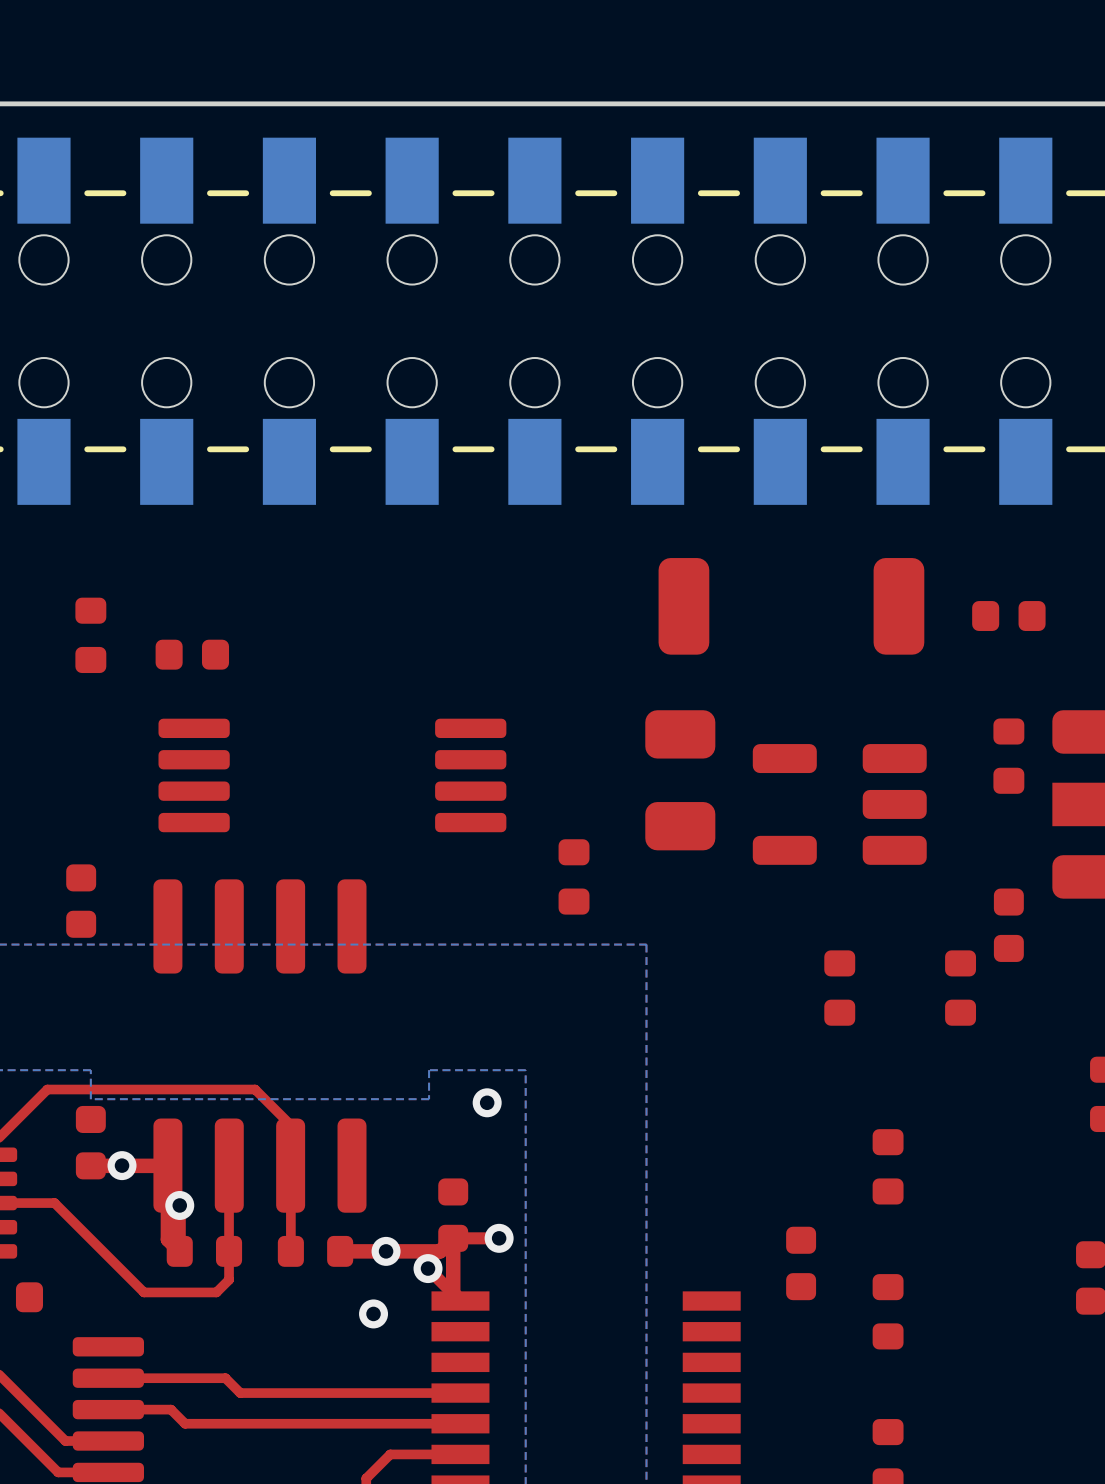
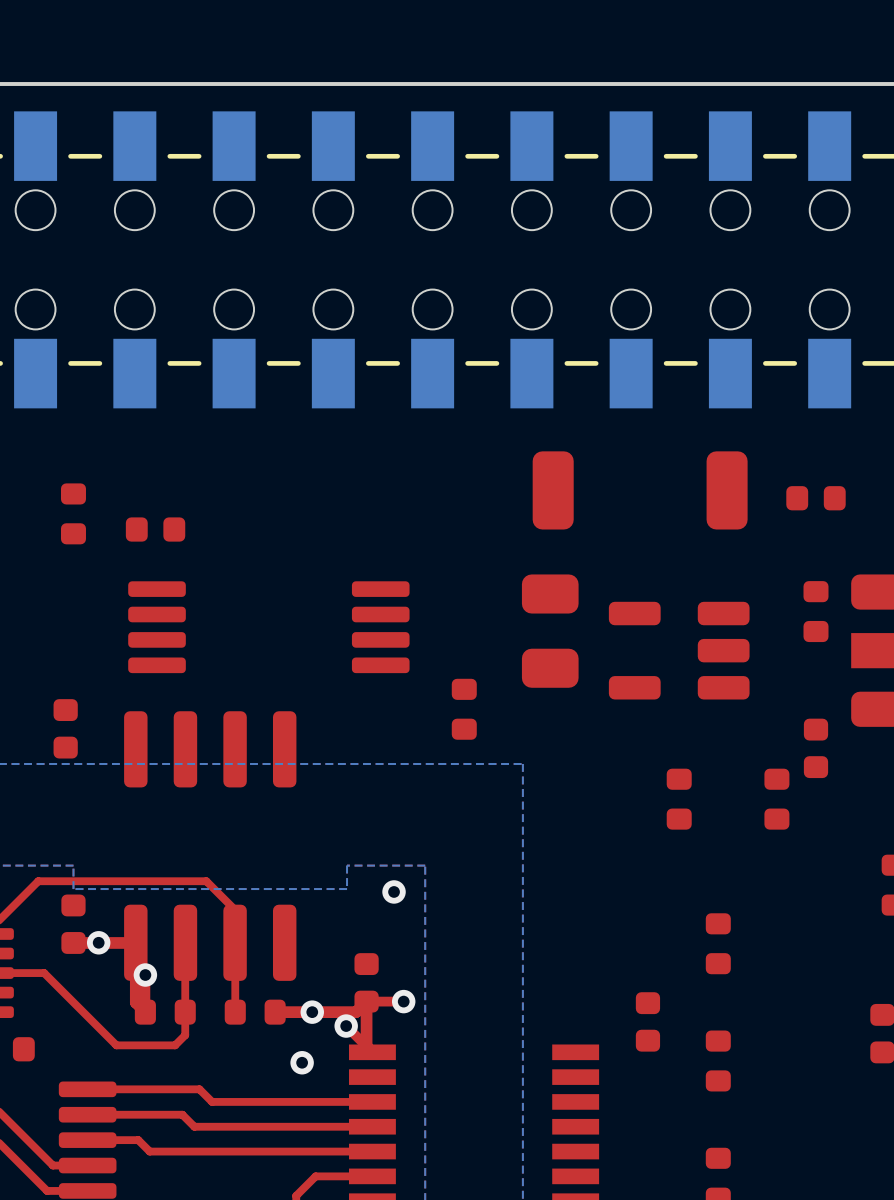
top track: none -> (87, 1089) (199, 1089) (212, 1101) (372, 1101)

